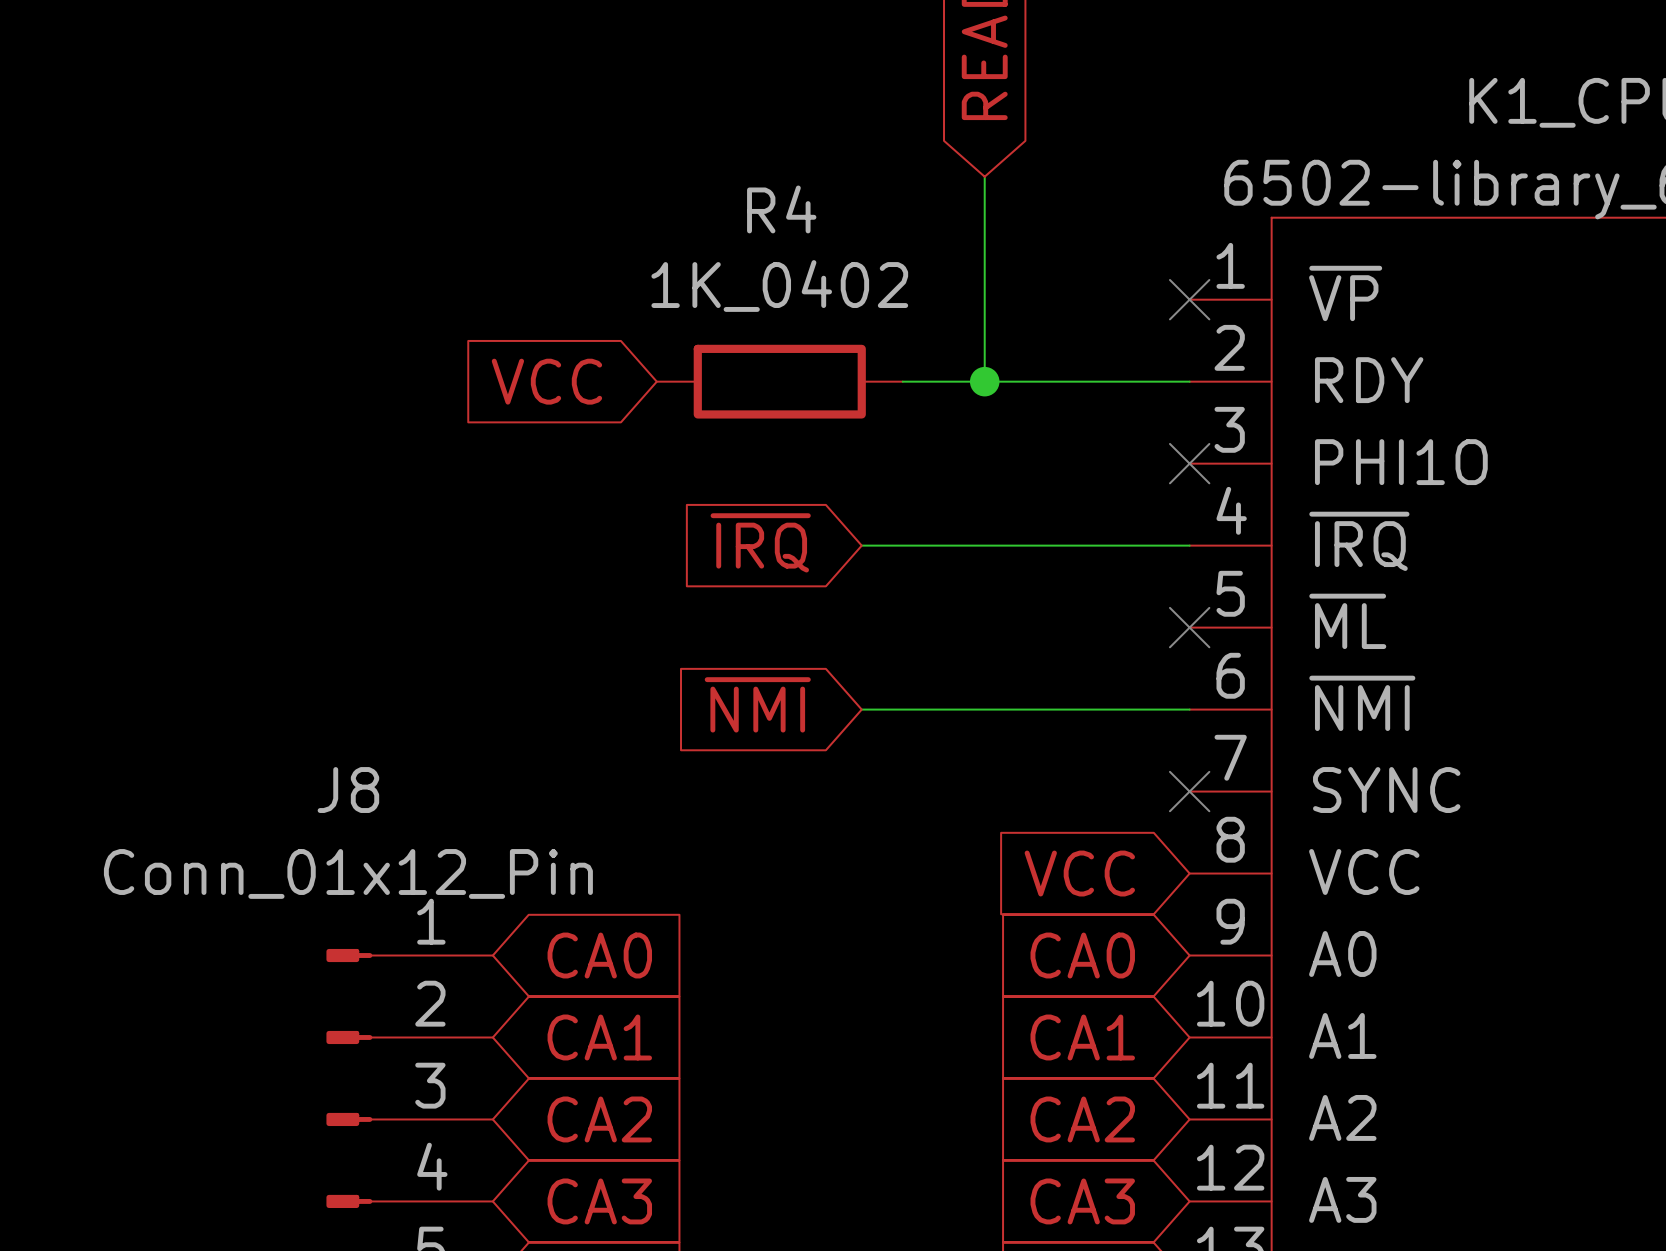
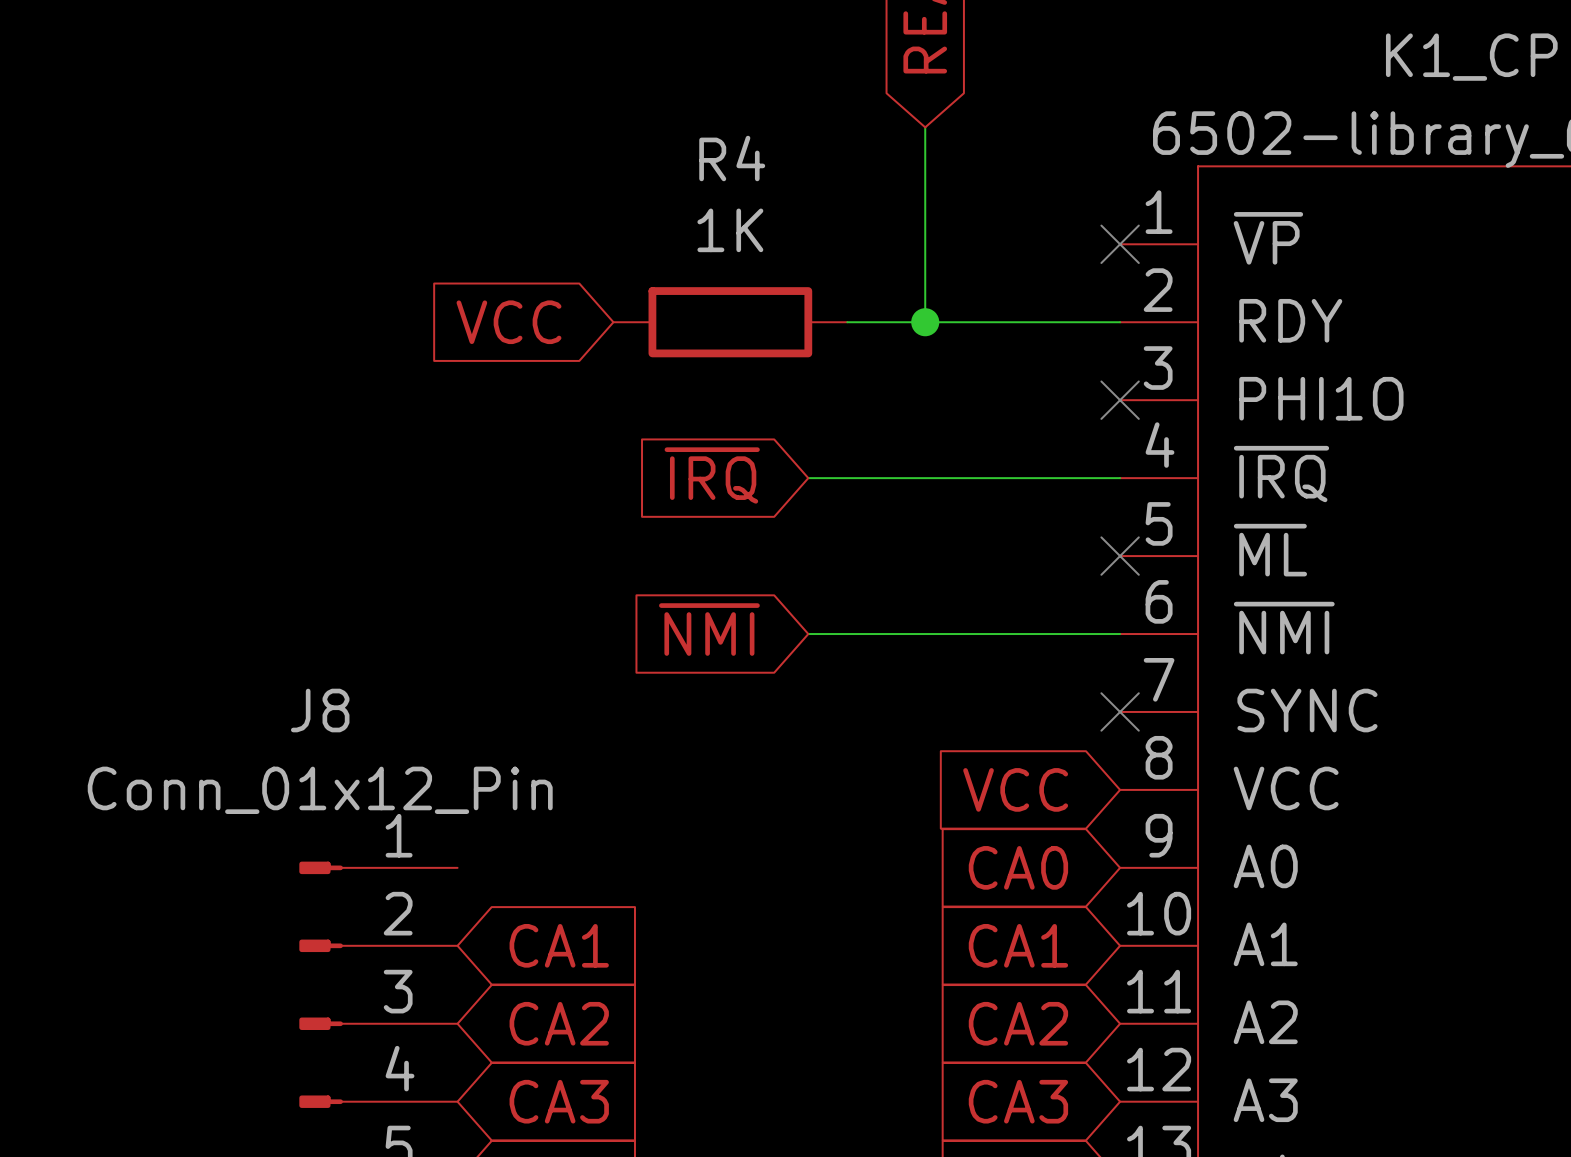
R4 value: 1K_0402 (779, 286) -> 1K (730, 230)
global label: CA0 (599, 955) -> none

